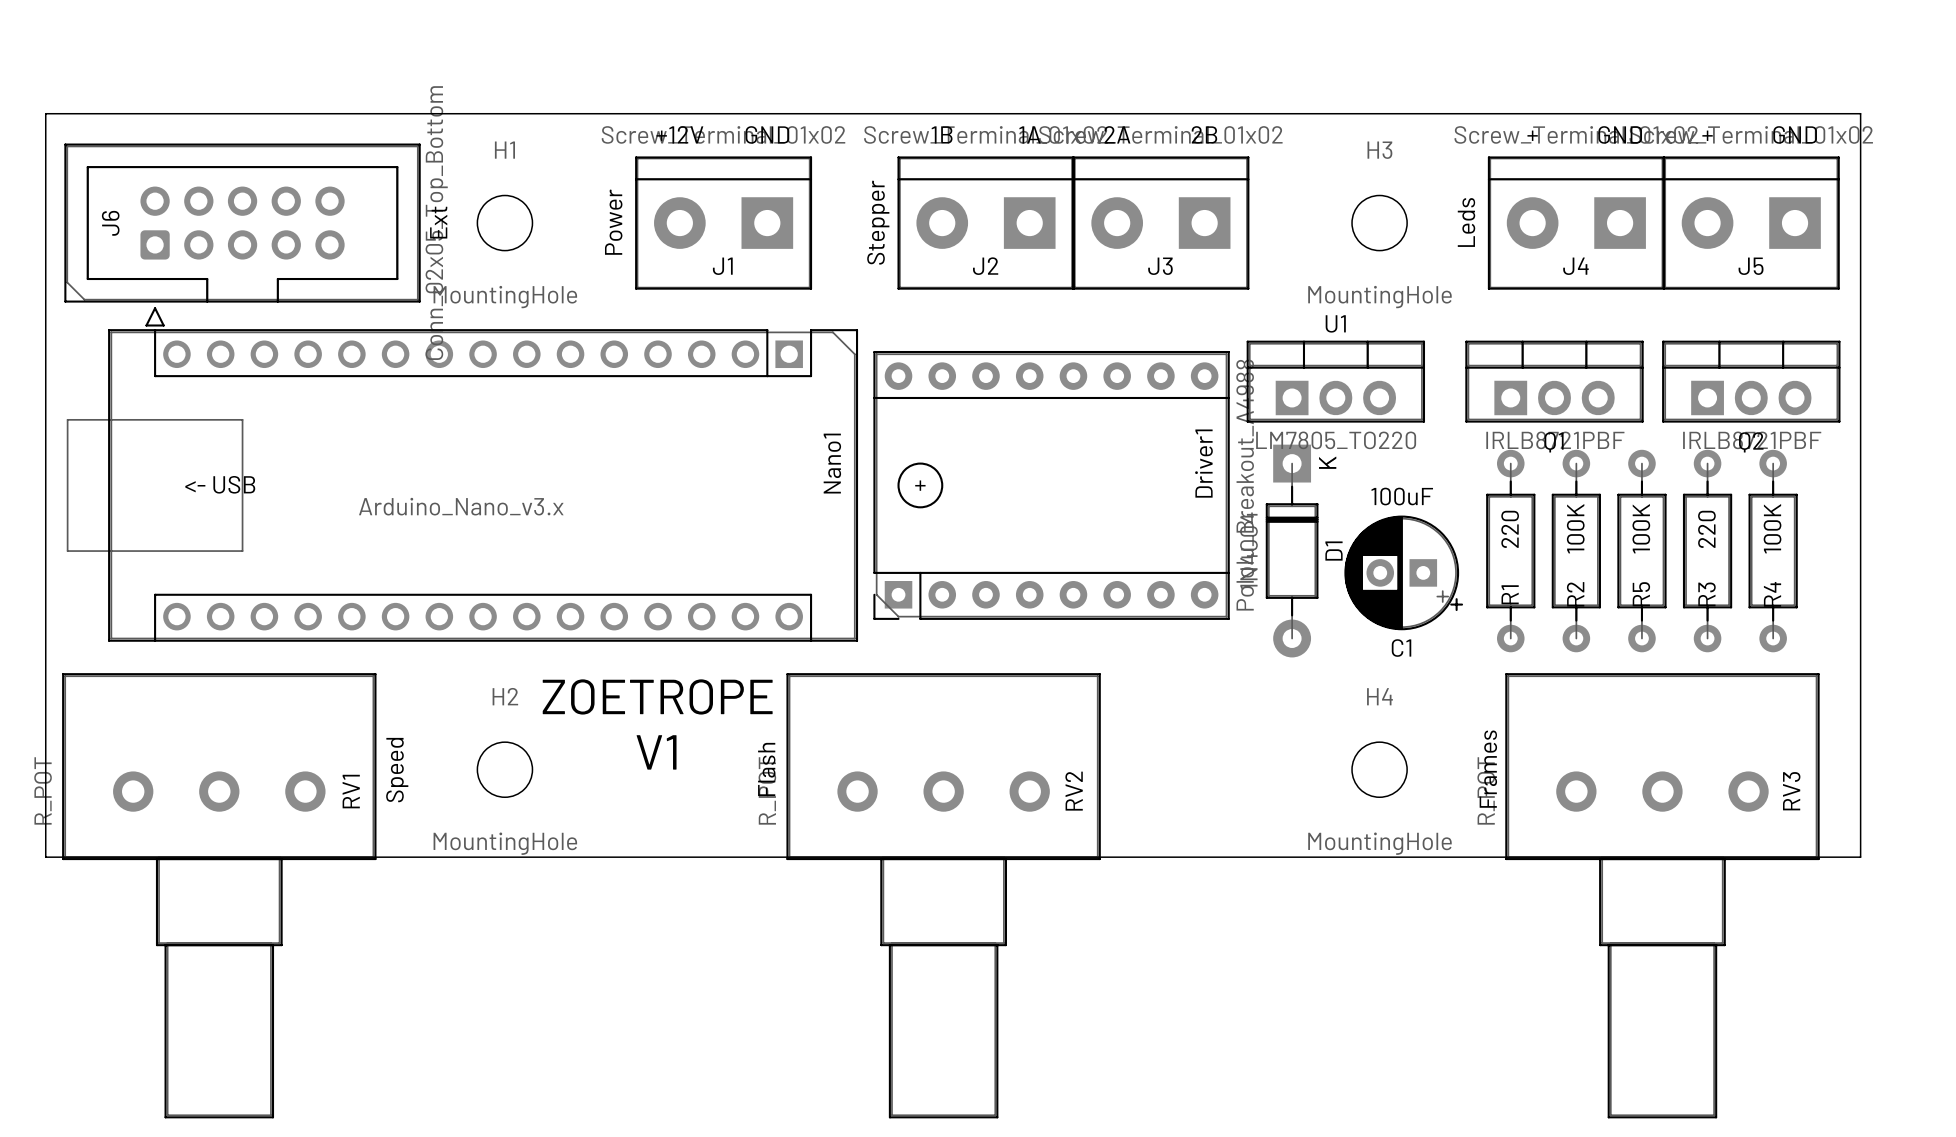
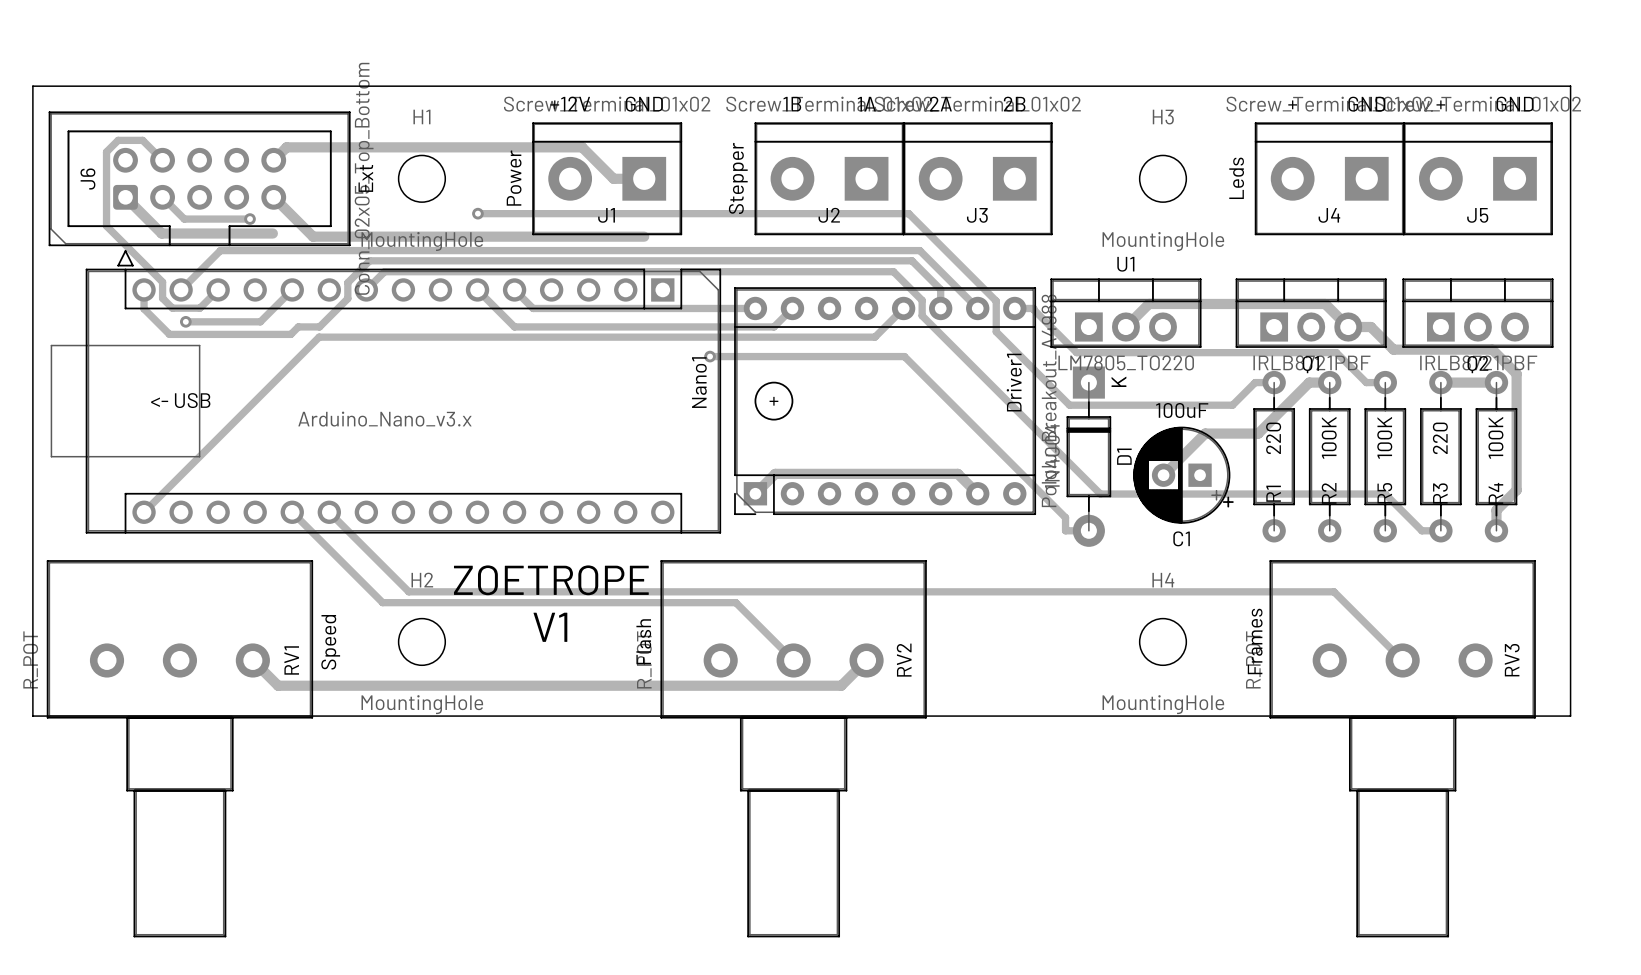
track: none -> (162, 160) (142, 140) (118, 140) (106, 151) (106, 226) (162, 282) (162, 298) (172, 308) (199, 308) (218, 289)
track: none -> (273, 160) (286, 147) (582, 147) (613, 178) (644, 178)
track: none -> (125, 197) (161, 233) (272, 233)
track: none -> (162, 197) (184, 219) (250, 219)
track: none -> (273, 197) (313, 236) (644, 236)
track: none -> (477, 213) (908, 213) (996, 301) (996, 331) (1069, 405) (1232, 405) (1255, 382) (1274, 382)
via: none -> (477, 213)
via: none -> (250, 219)
track: none -> (144, 289) (144, 308) (169, 334) (290, 334) (298, 326) (319, 326) (347, 298) (347, 282) (369, 260) (911, 260) (940, 289) (940, 308)
track: none -> (181, 289) (220, 250) (919, 250) (977, 308)
track: none -> (292, 289) (260, 321) (185, 321)
track: none -> (366, 289) (384, 271) (893, 271) (922, 300) (922, 315) (1100, 494) (1385, 494) (1421, 530) (1440, 530)
track: none -> (477, 289) (514, 326) (774, 326) (792, 308)
track: none -> (514, 289) (533, 308) (755, 308)
track: none -> (903, 308) (874, 337) (319, 337) (144, 512)
track: none -> (1014, 308) (1033, 308) (1076, 352) (1336, 352) (1366, 382) (1385, 382)
via: none -> (185, 321)
track: none -> (1125, 327) (1148, 303) (1325, 303) (1348, 327) (1370, 327) (1393, 349) (1492, 349) (1516, 373) (1516, 490) (1496, 510) (1496, 530)
track: none -> (710, 356) (904, 356) (1065, 517) (1065, 530) (1088, 530)
via: none -> (710, 356)
track: none -> (1329, 382) (1309, 382) (1258, 433) (1205, 433) (1163, 475)
track: none -> (1440, 382) (1496, 382)
track: none -> (755, 493) (775, 473) (957, 473) (977, 493)
track: none -> (292, 512) (382, 602) (735, 602) (793, 660)
track: none -> (329, 512) (408, 591) (1334, 591) (1402, 660)
track: none -> (252, 660) (278, 685) (841, 685) (866, 660)

